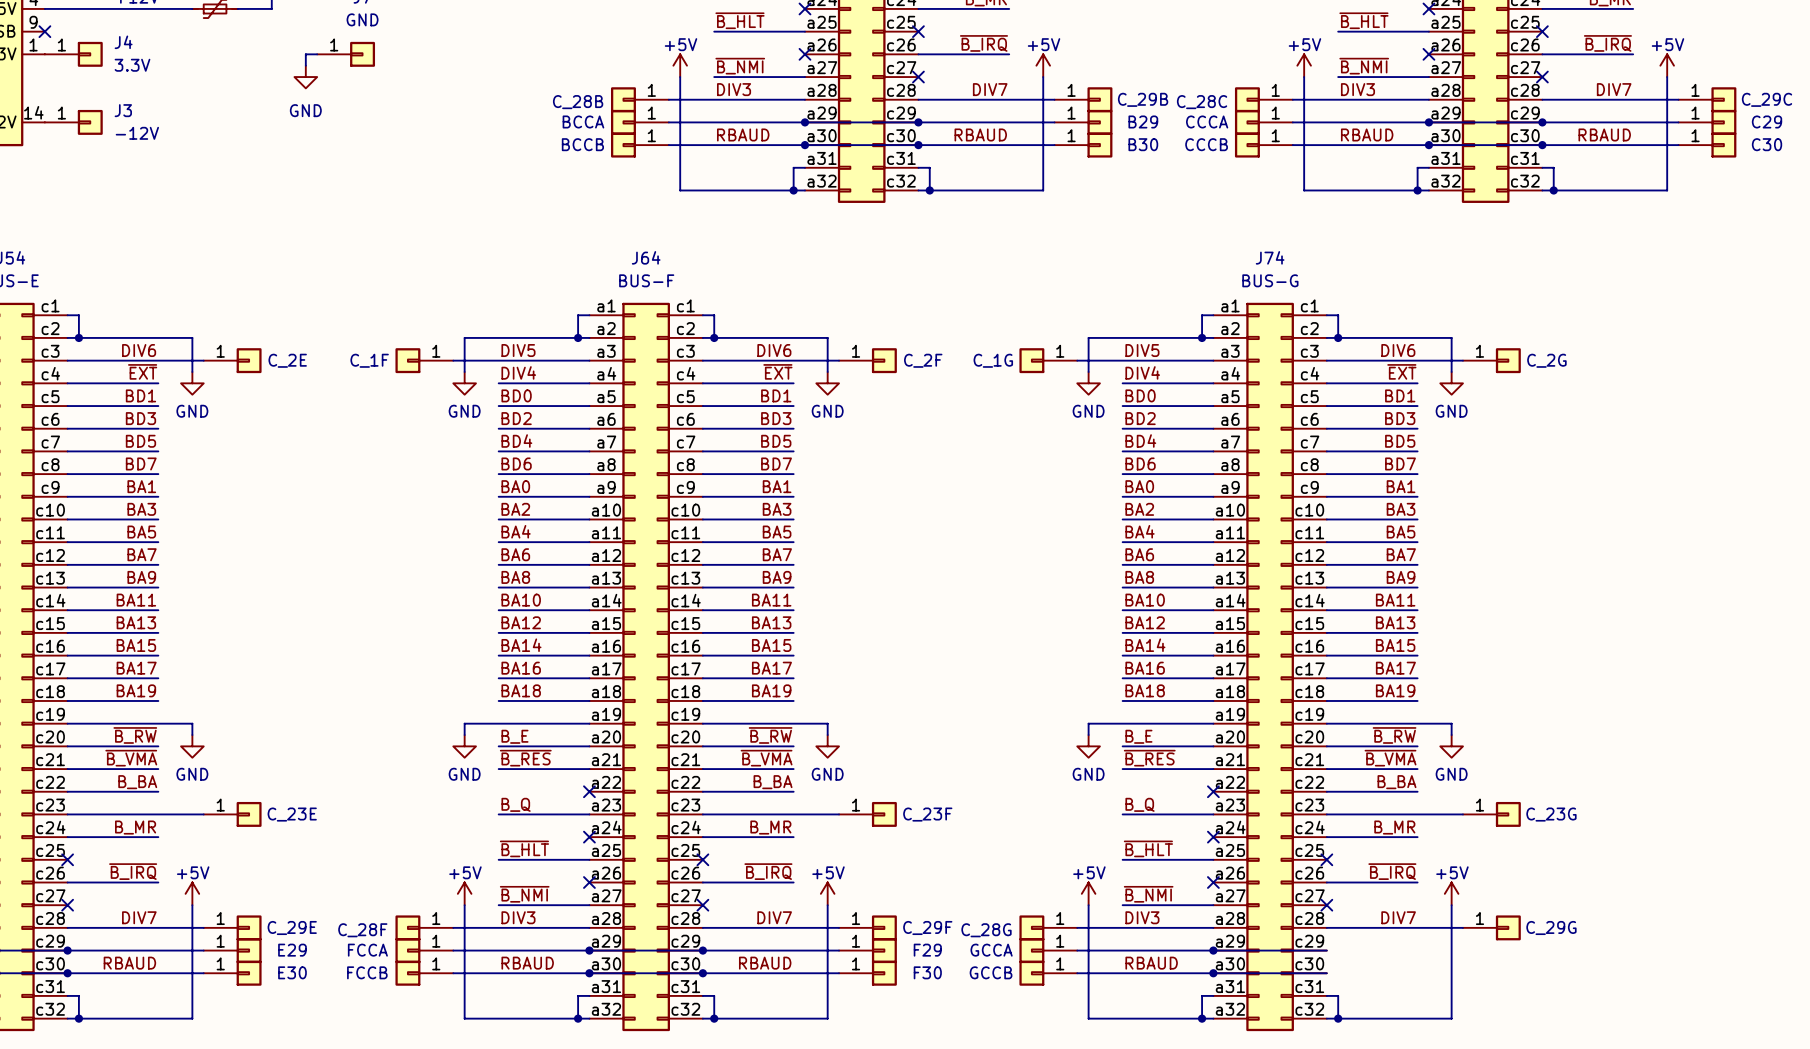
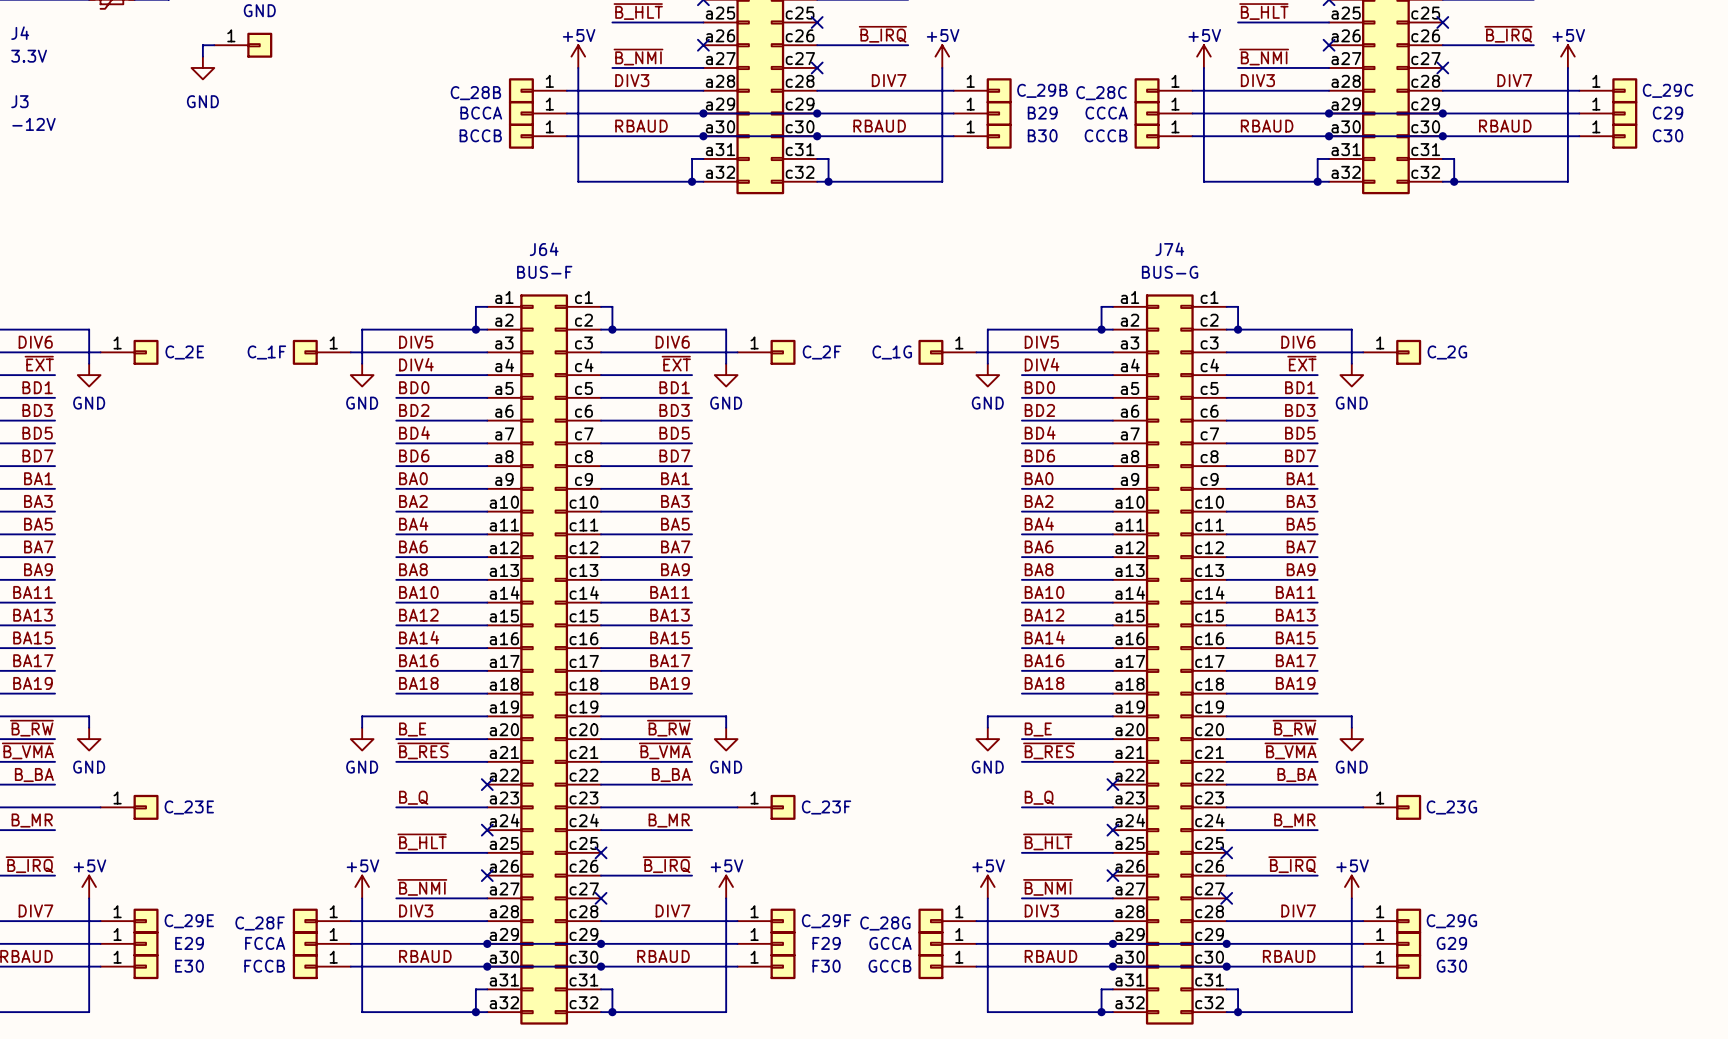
wire: none -> (1226, 943) (1363, 943)
junction: none -> (1226, 943)
part: none -> G29 (1392, 943)
label: none -> RBAUD (1289, 956)
wire: none -> (1226, 966) (1363, 966)
junction: none -> (1226, 966)
part: none -> G30 (1392, 966)

